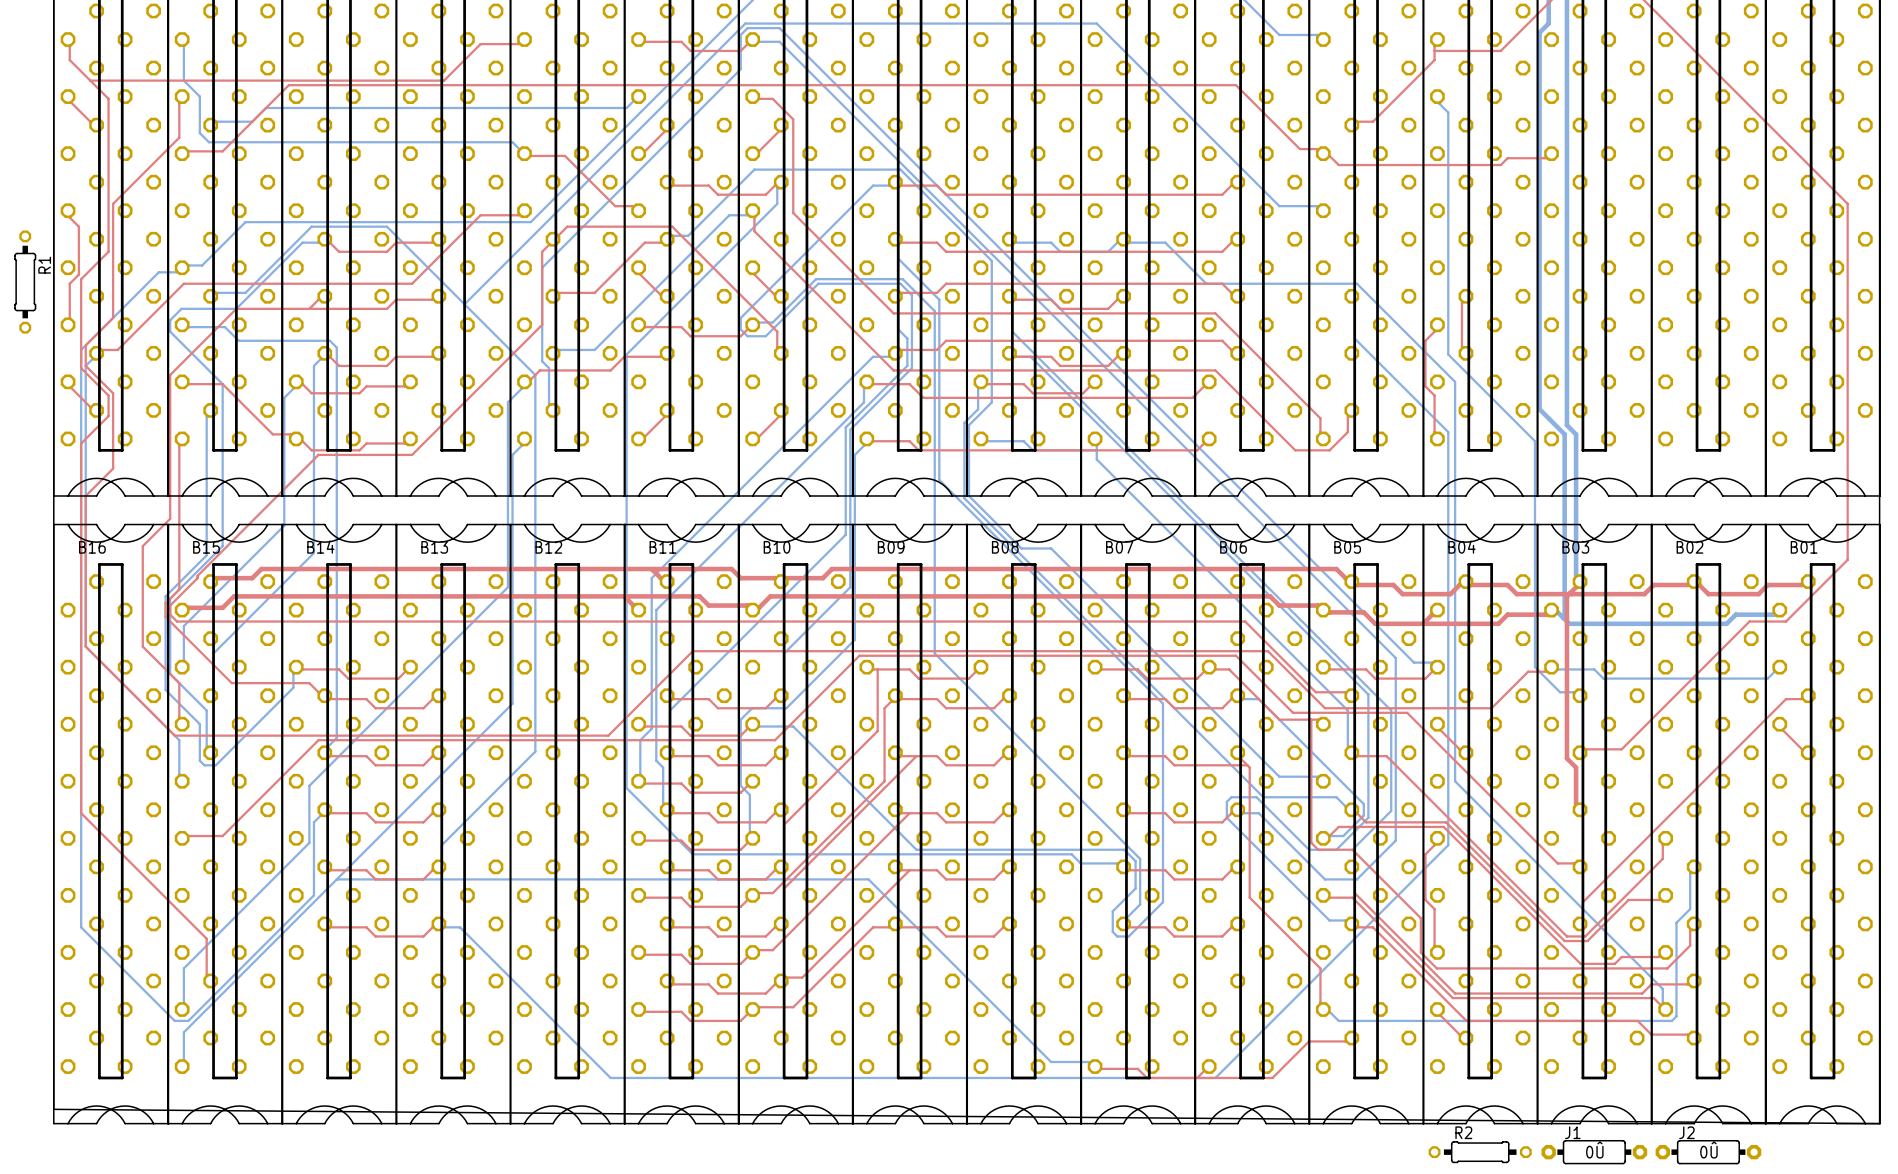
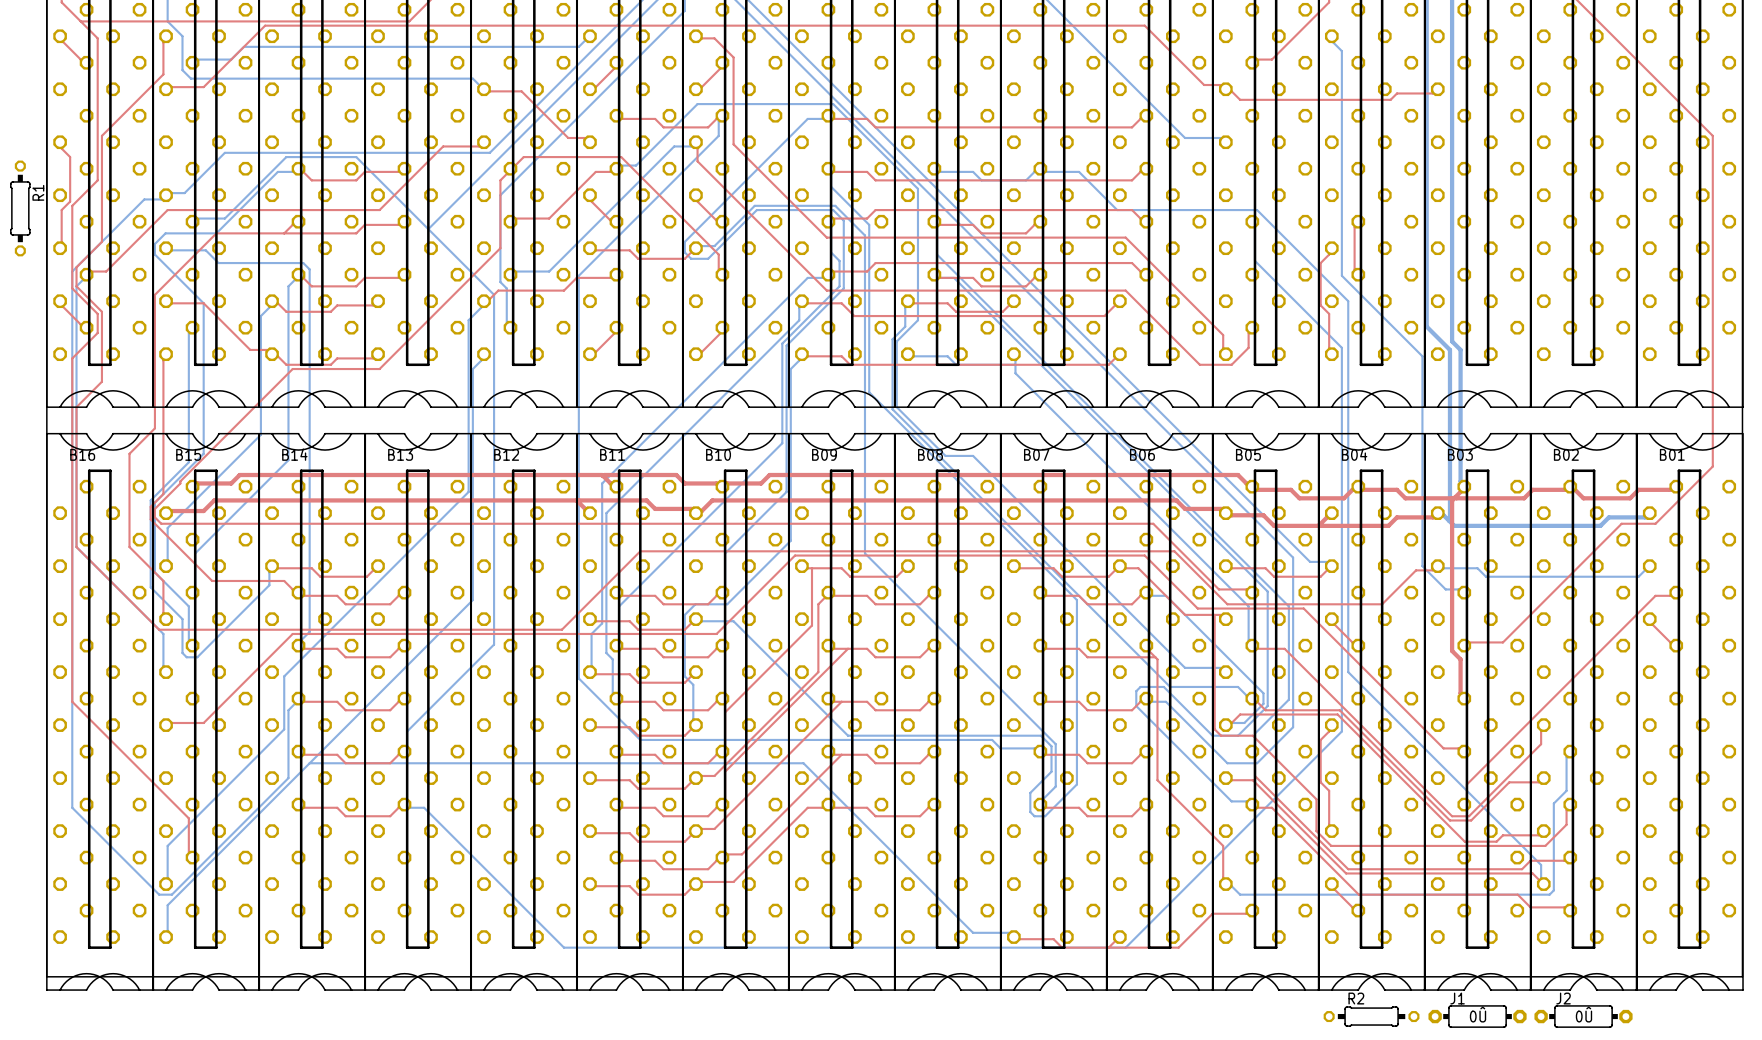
board edge: (53, 1109) (1879, 1123) (1879, 1109) -> (46, 976) (1742, 976)

